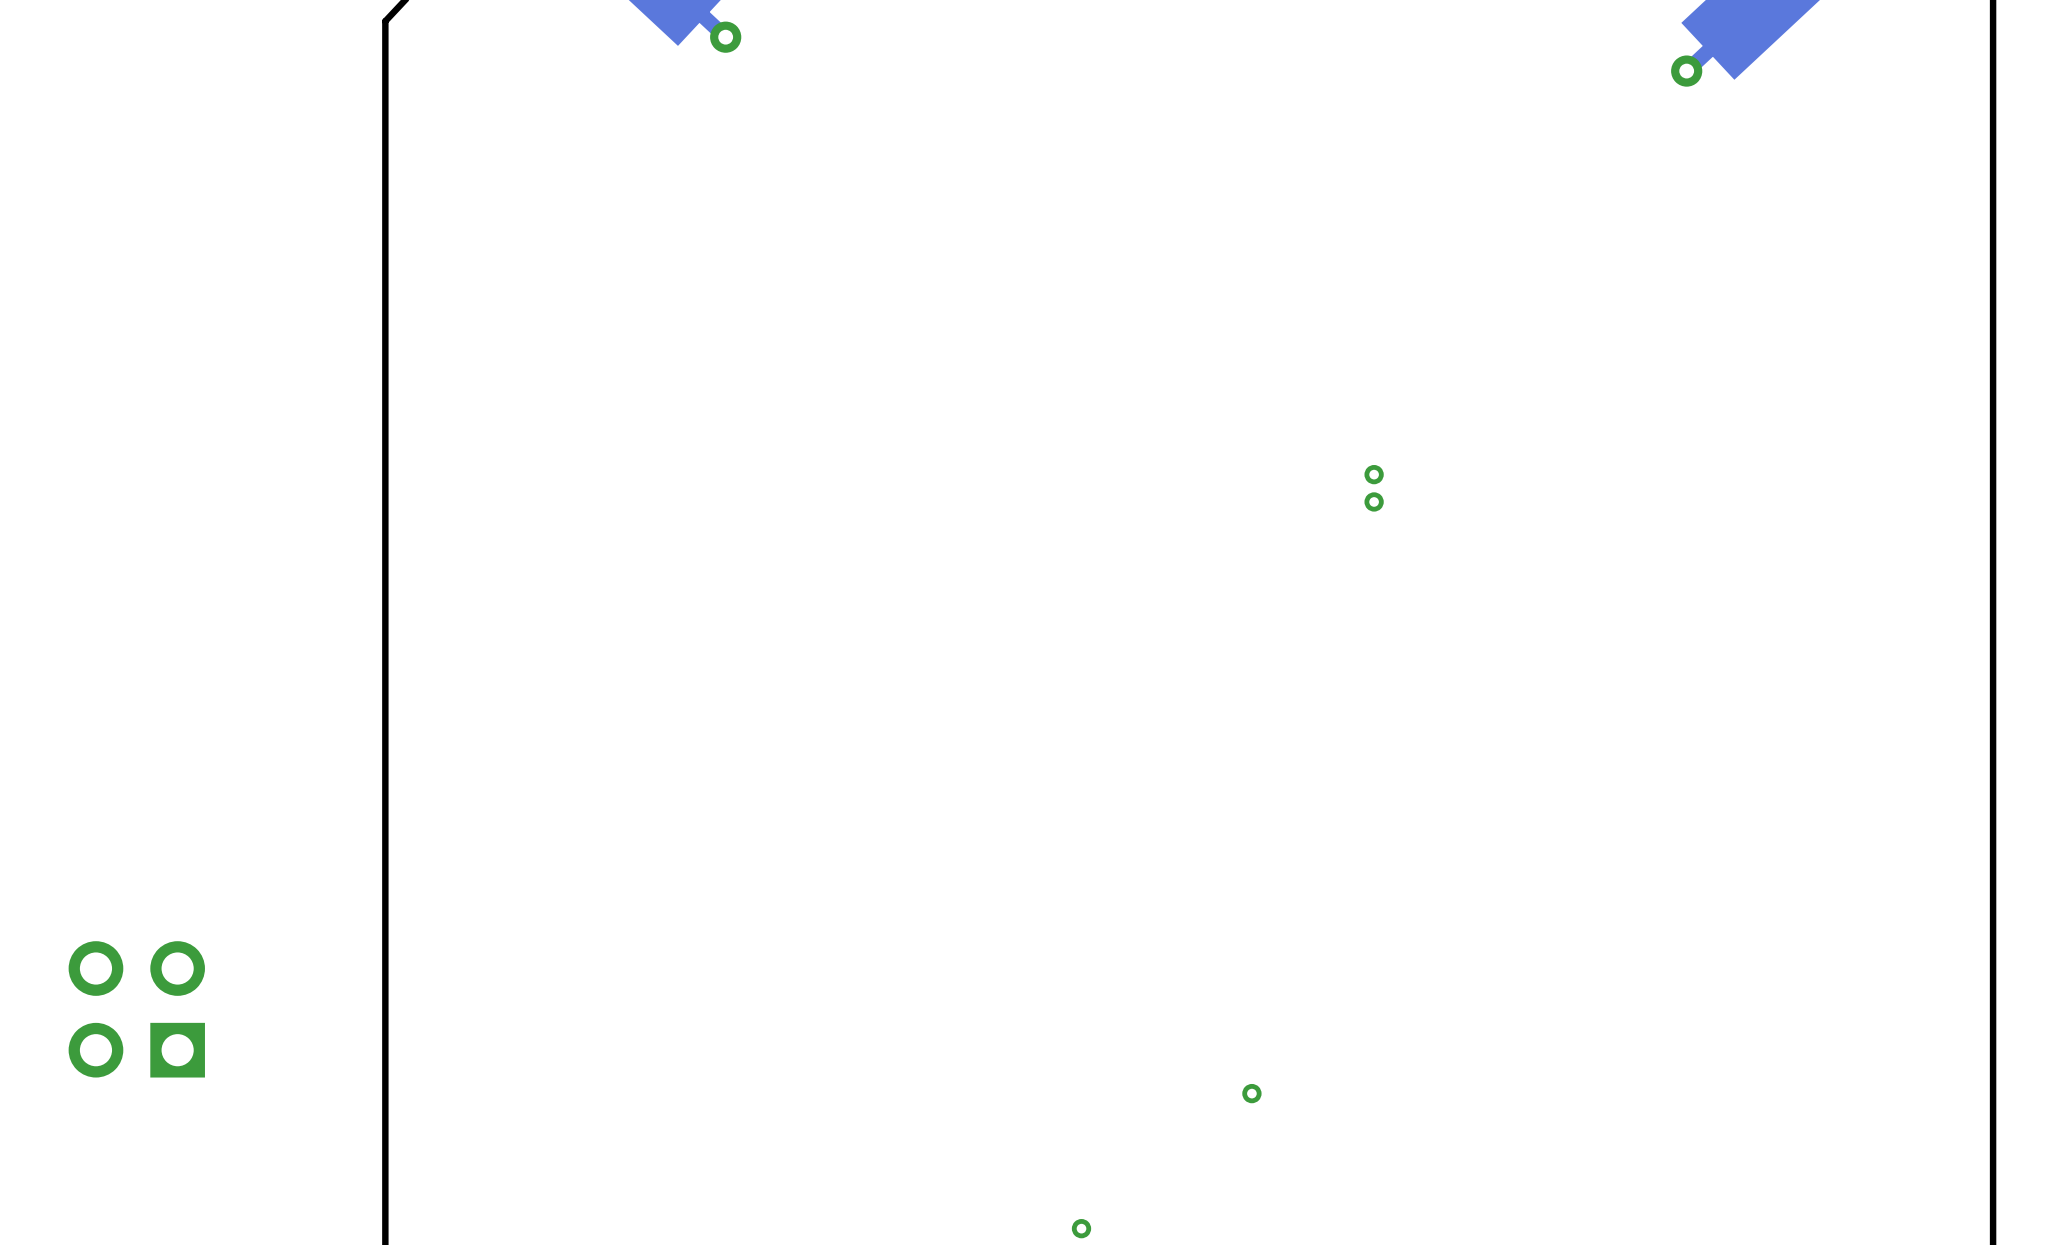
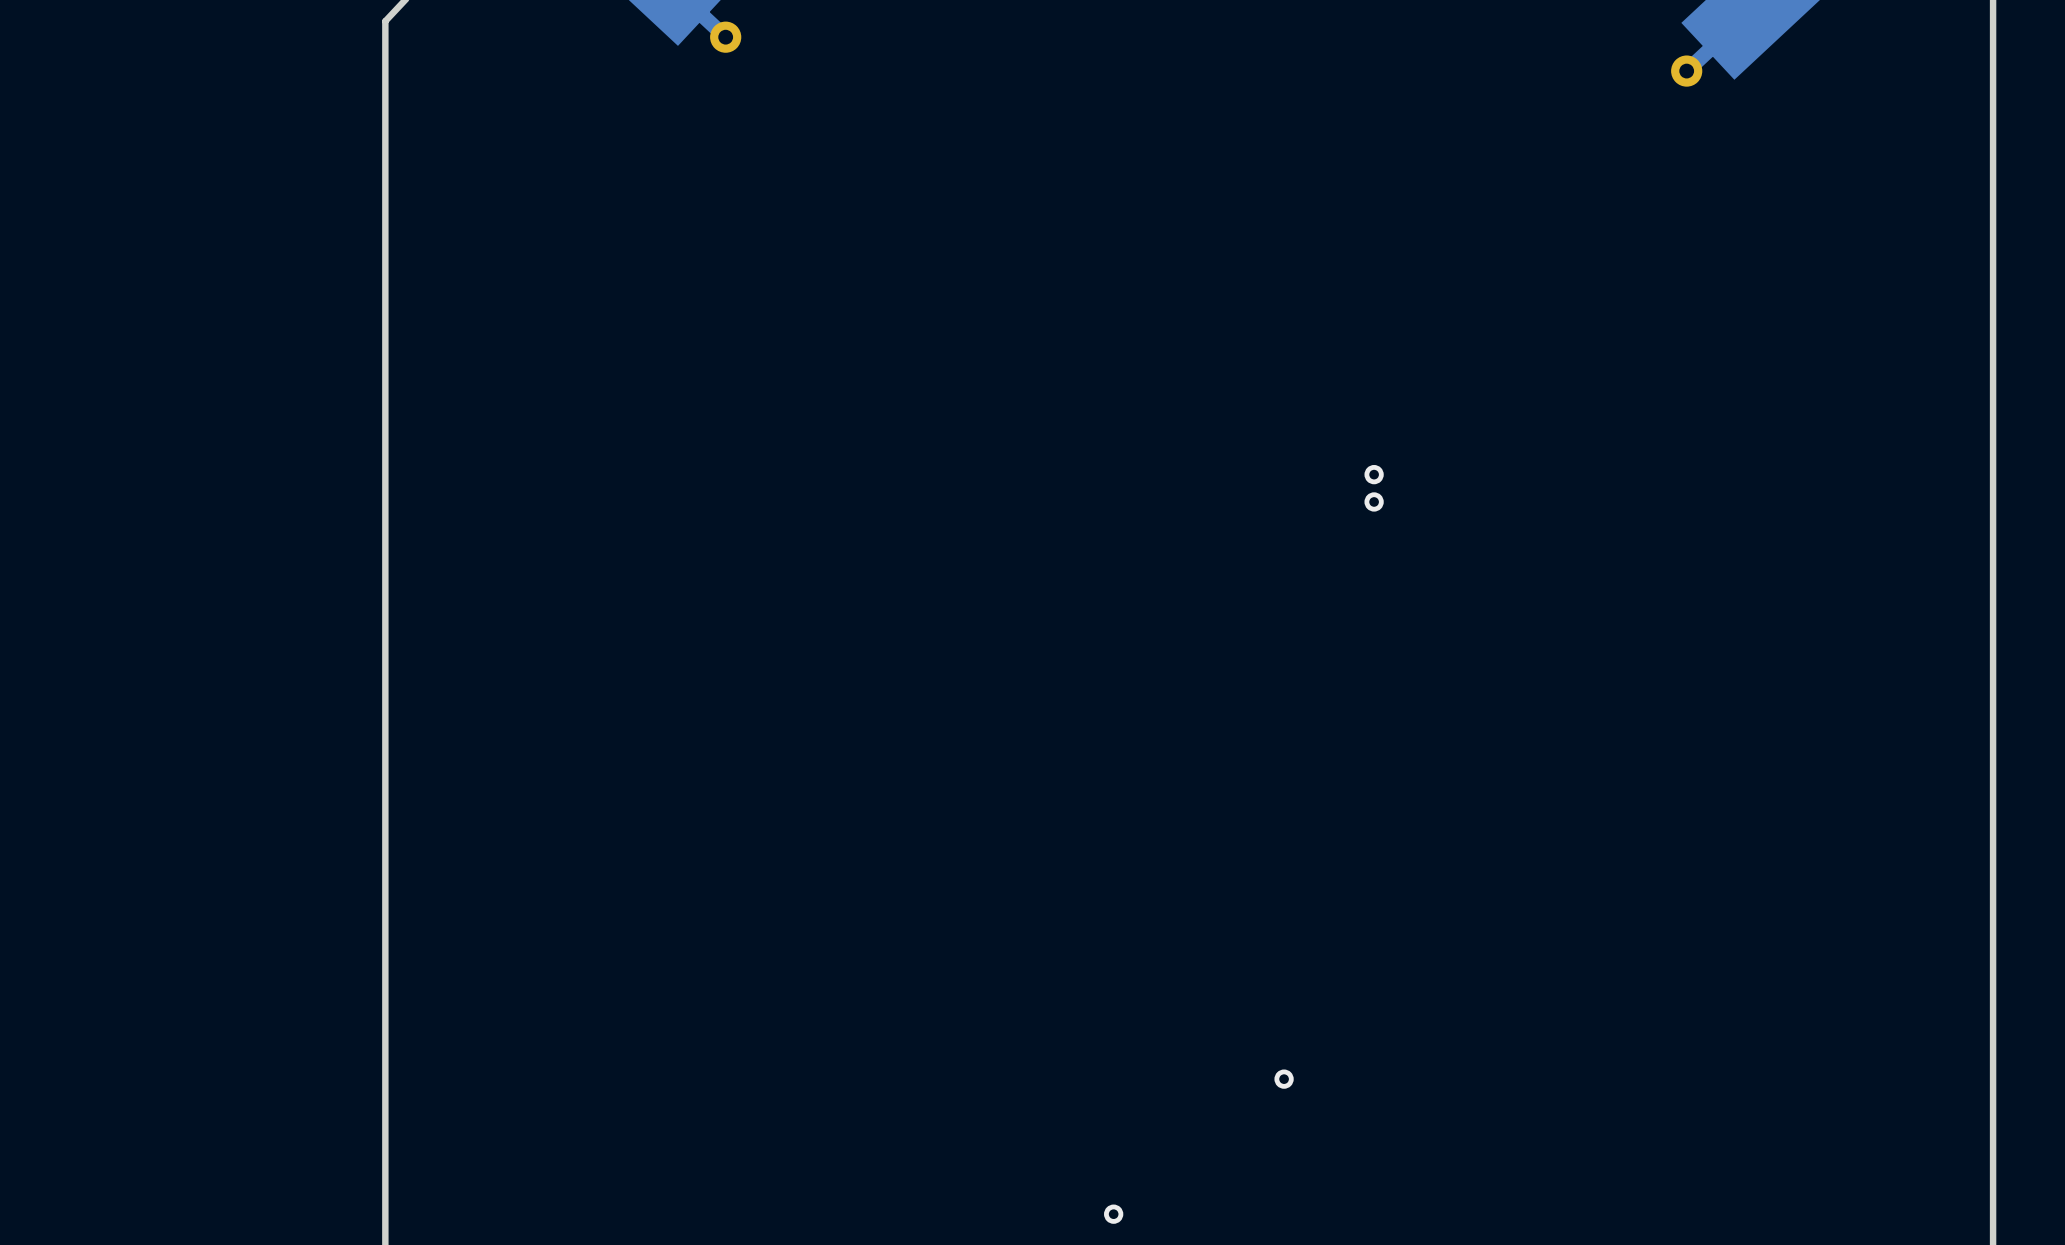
part: (136, 1009) -> none
via position: (1251, 1093) -> (1284, 1079)
via position: (1081, 1228) -> (1113, 1214)

